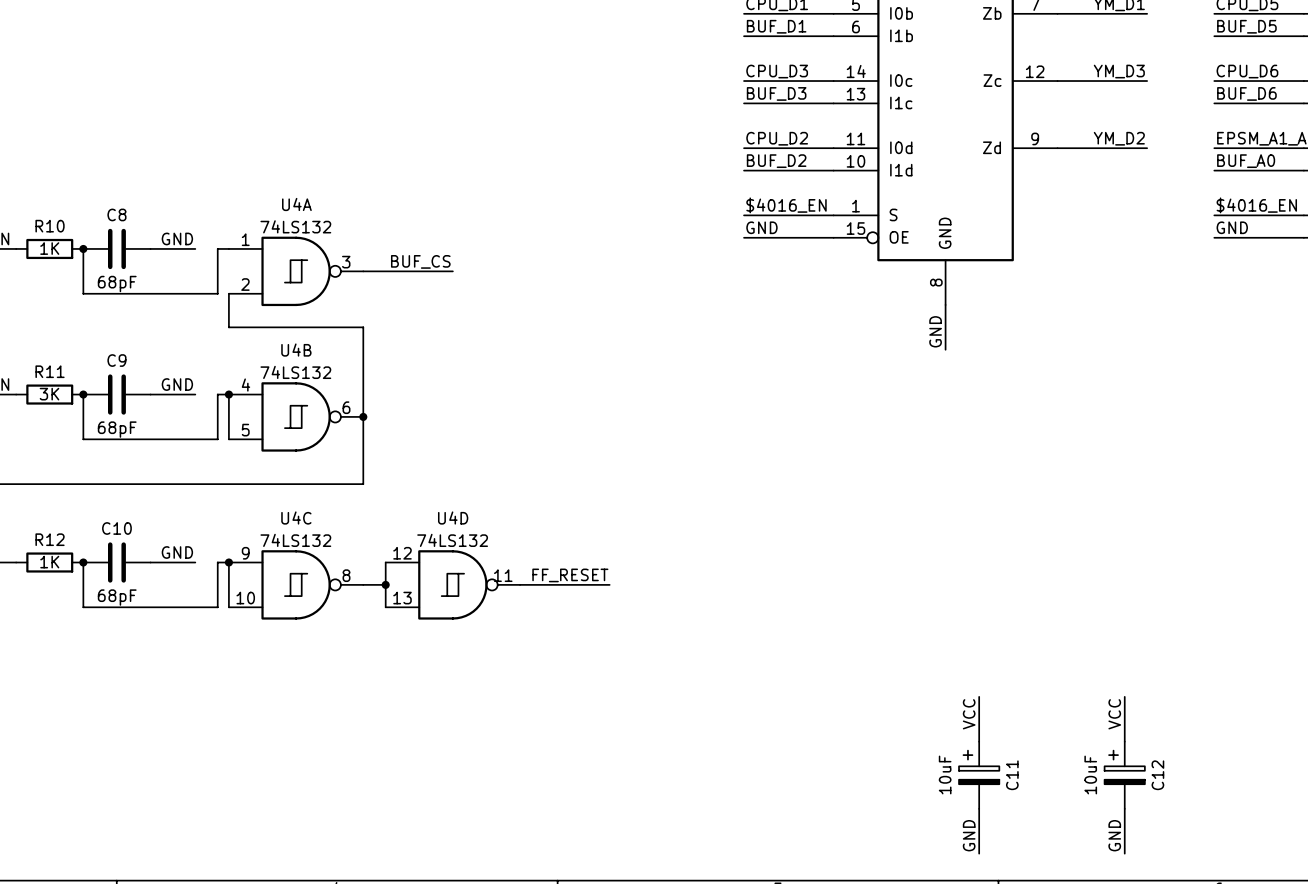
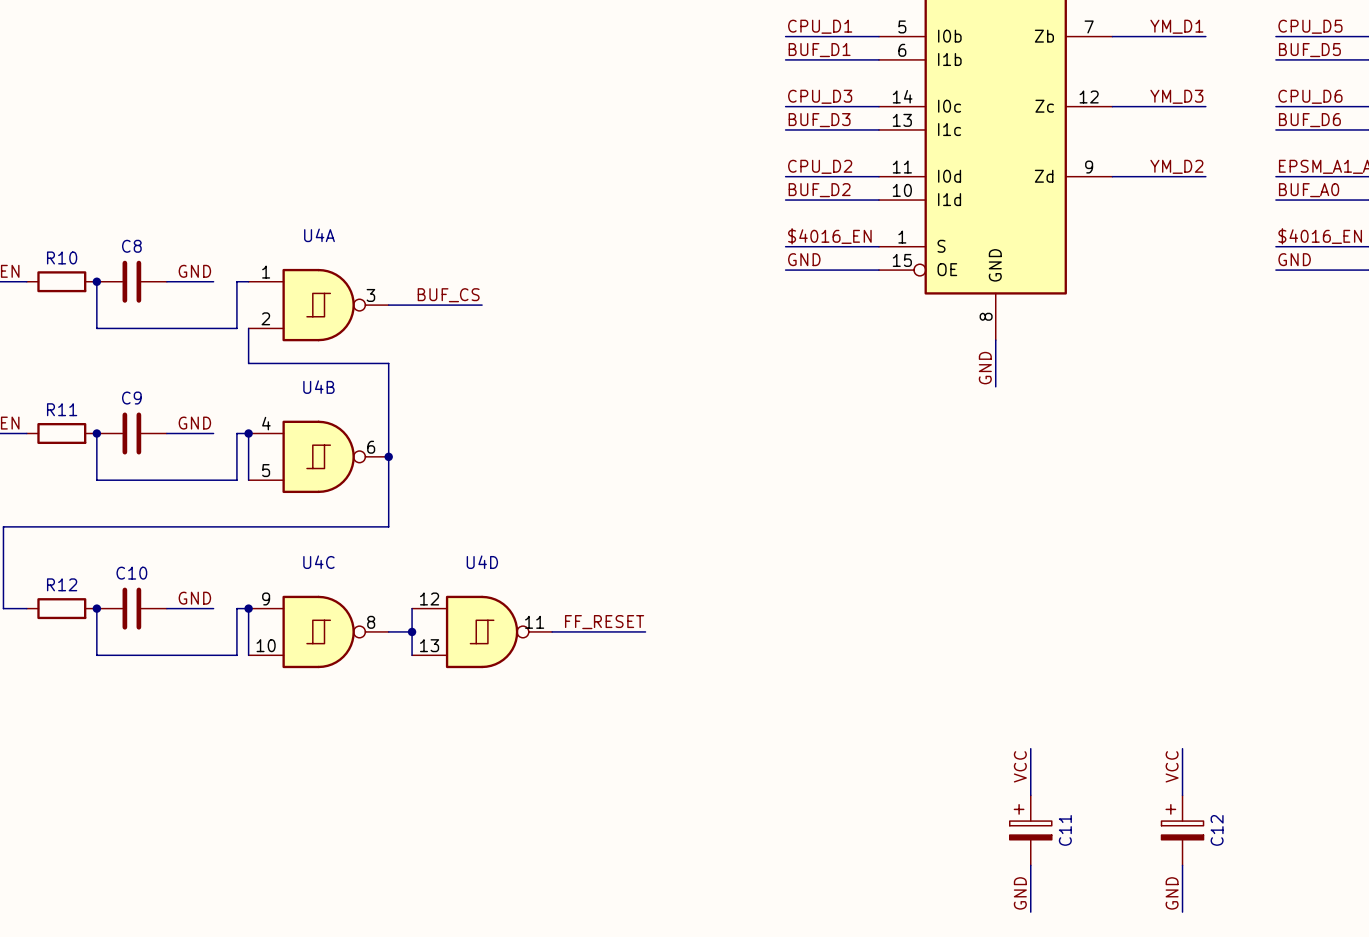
U4A value: 74LS132 (295, 226) -> none
R10 value: 1K (49, 248) -> none
C8 value: 68pF (117, 284) -> none
U4B value: 74LS132 (295, 372) -> none
R11 value: 3K (49, 394) -> none
C9 value: 68pF (117, 429) -> none
U4C value: 74LS132 (295, 540) -> none
U4D value: 74LS132 (452, 540) -> none
R12 value: 1K (49, 562) -> none
C10 value: 68pF (117, 597) -> none
C11 value: 10uF (945, 774) -> none
C12 value: 10uF (1090, 774) -> none

